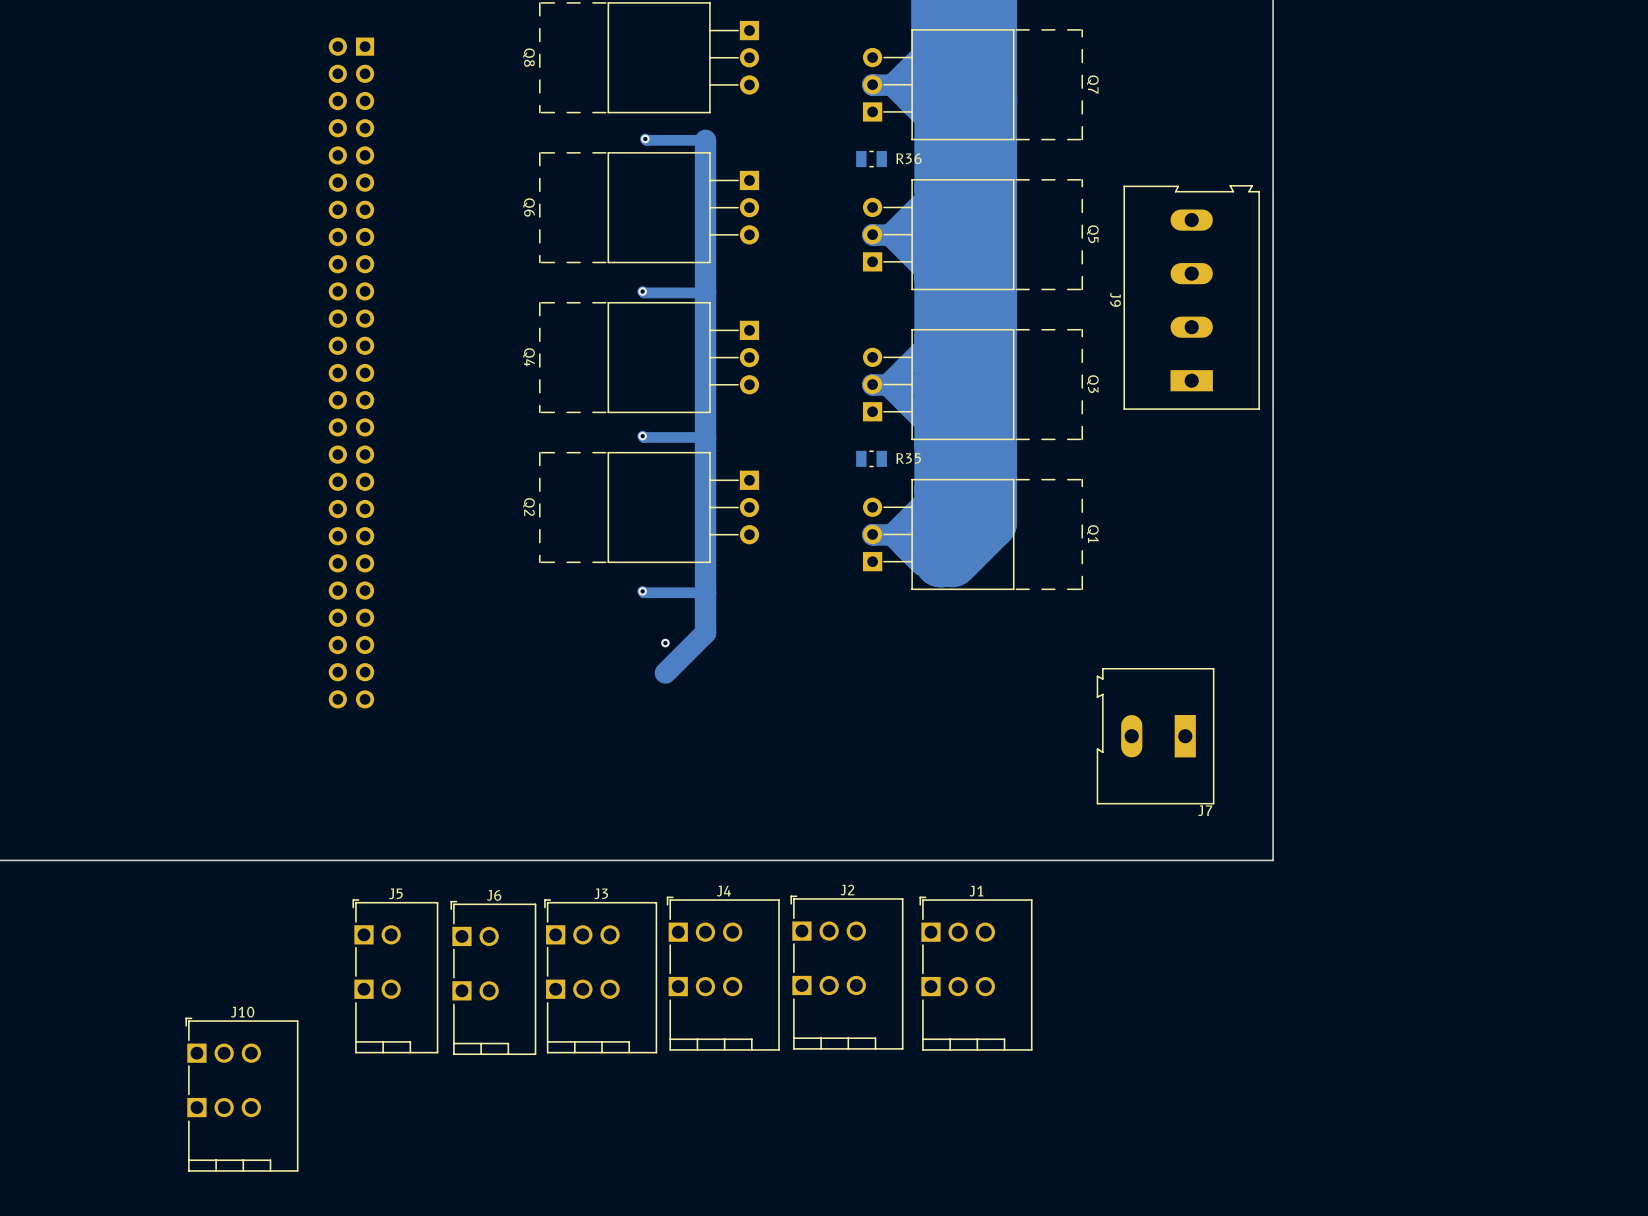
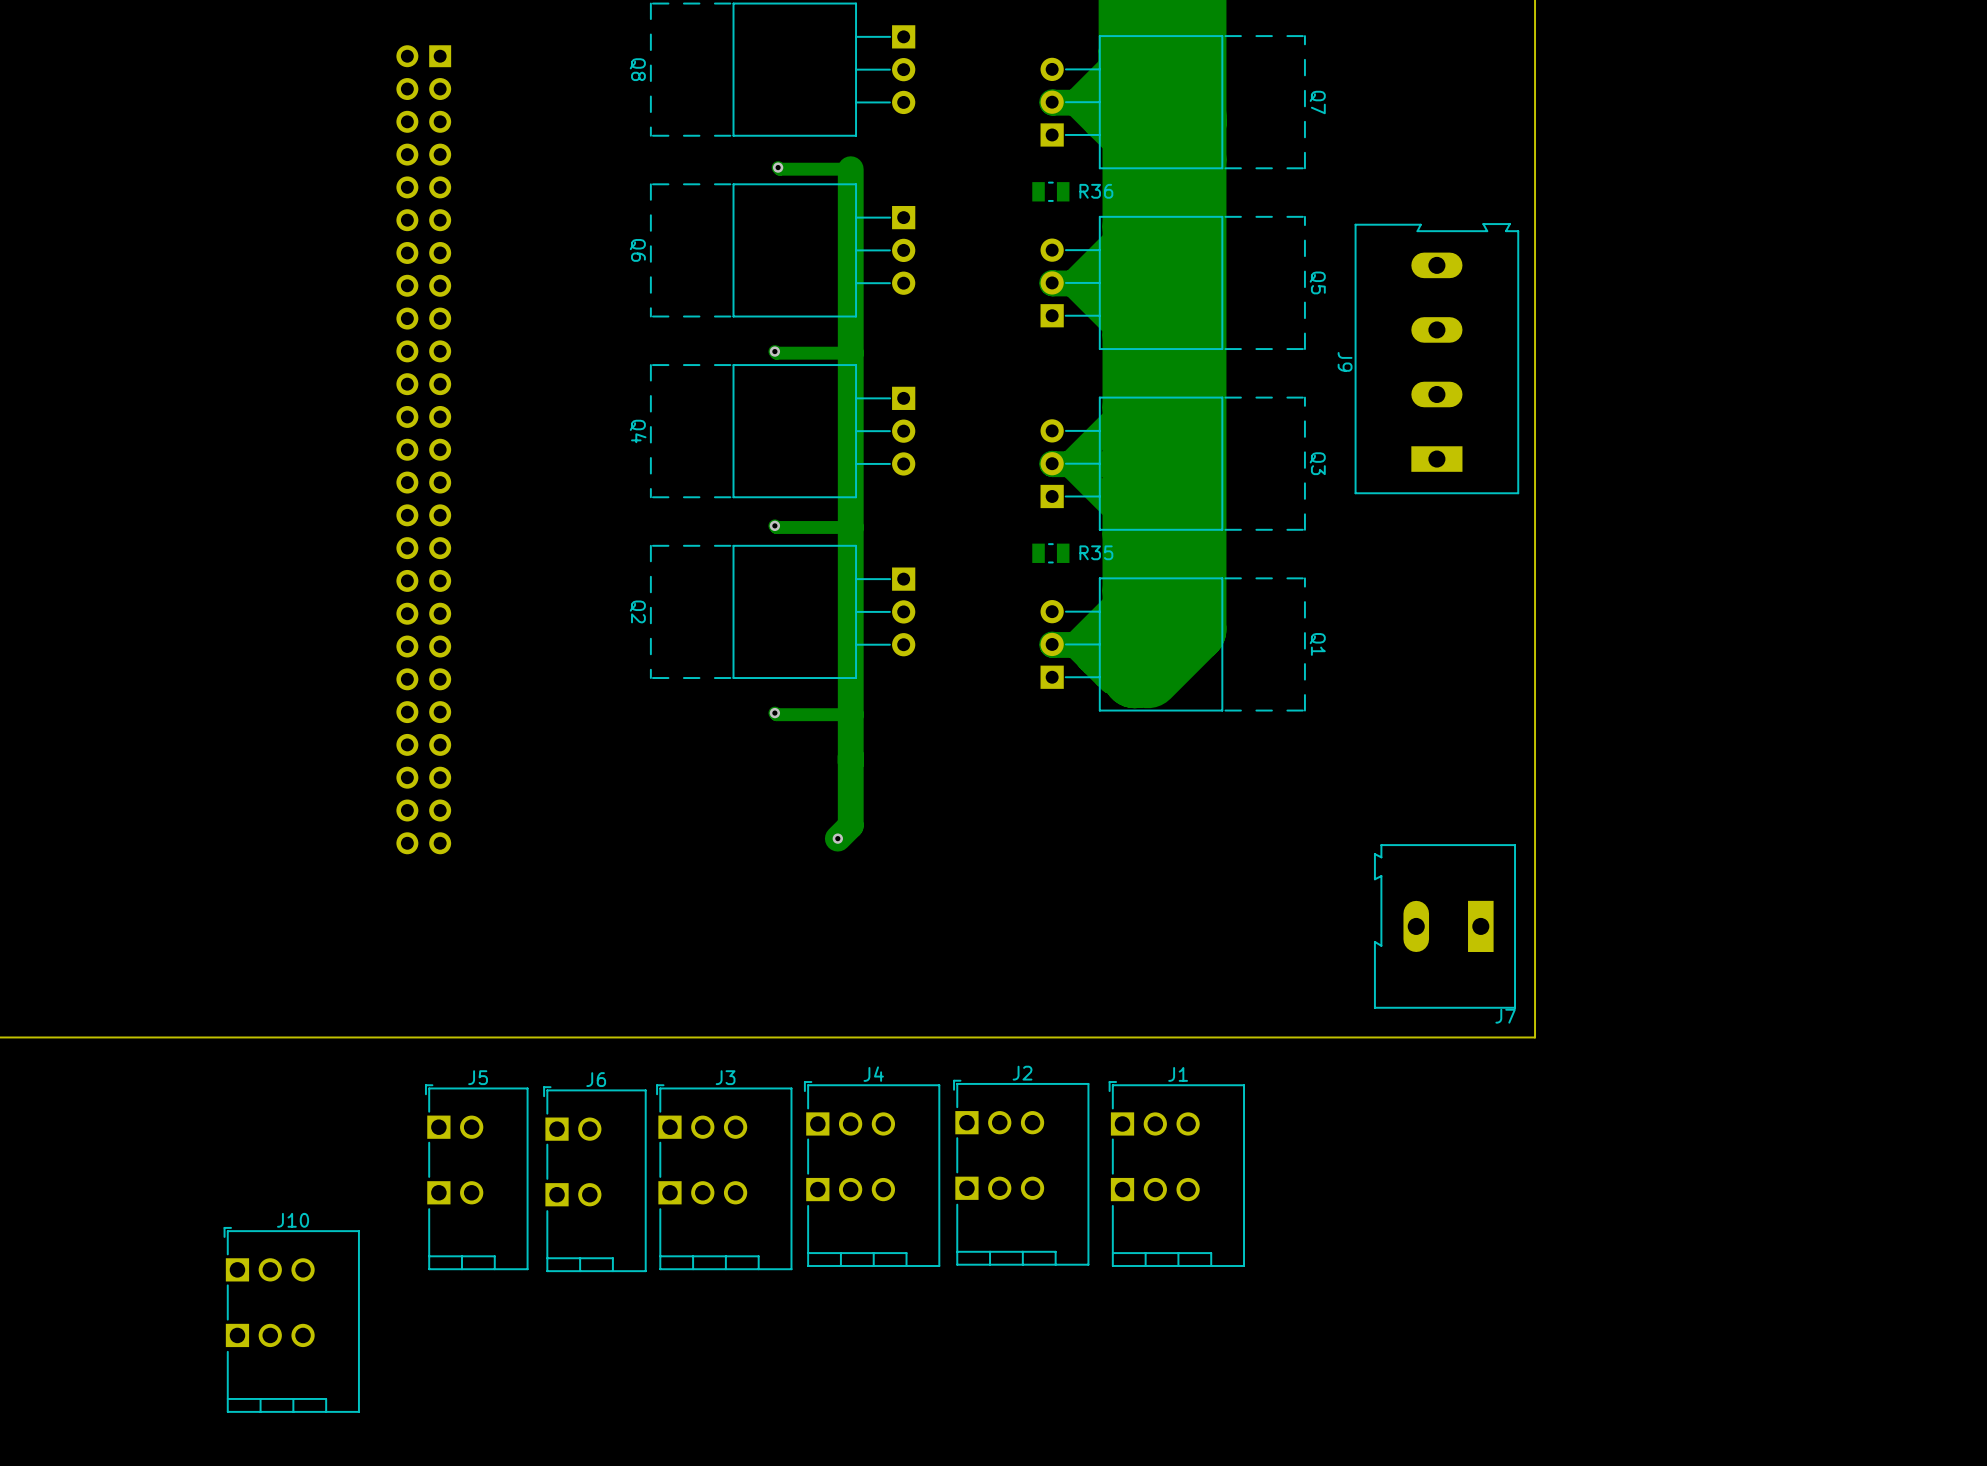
track: (705, 632) (665, 673) -> (850, 763) (850, 825) (837, 838)
via position: (665, 643) -> (837, 838)
J7 position: (1155, 736) -> (1444, 926)

